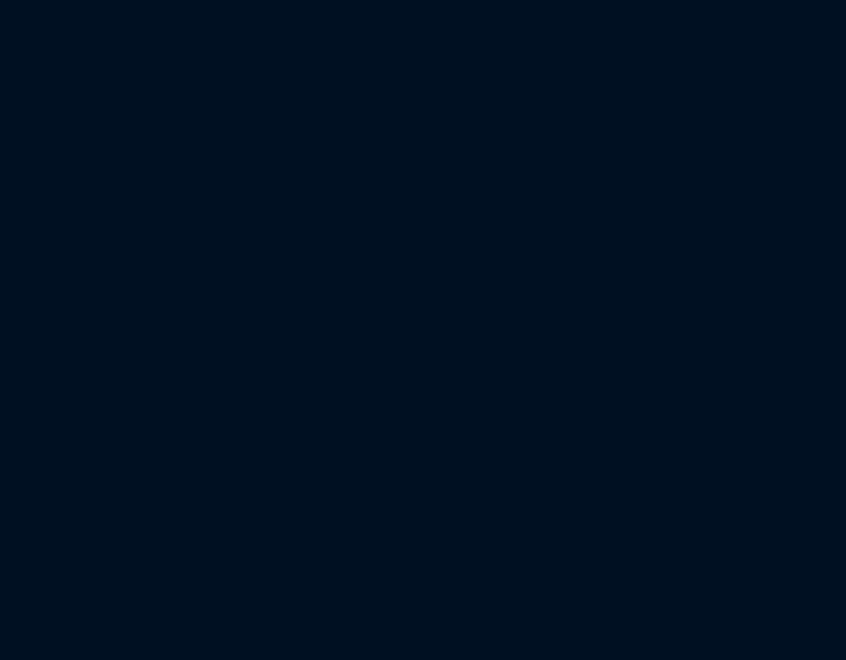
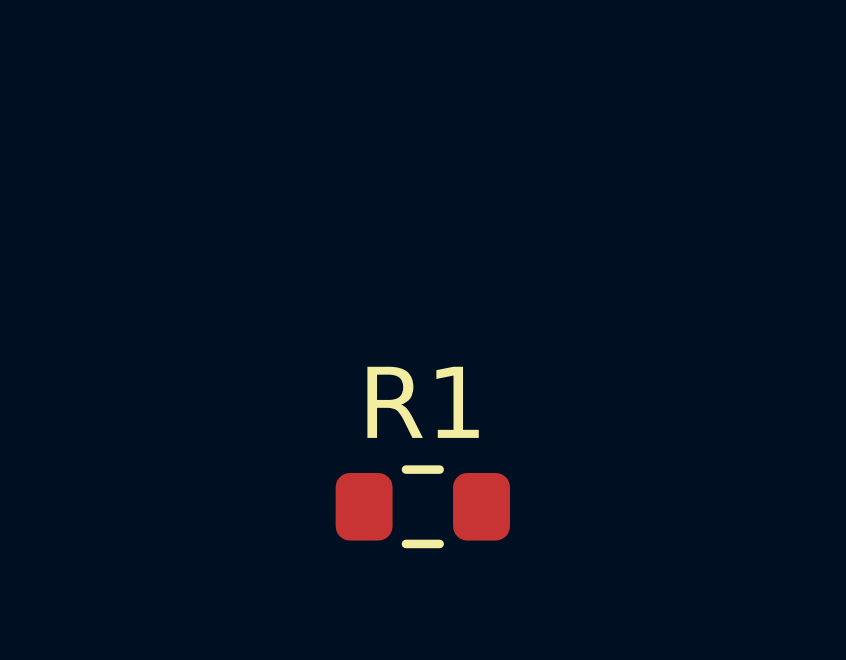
R1: none -> (422, 506)

